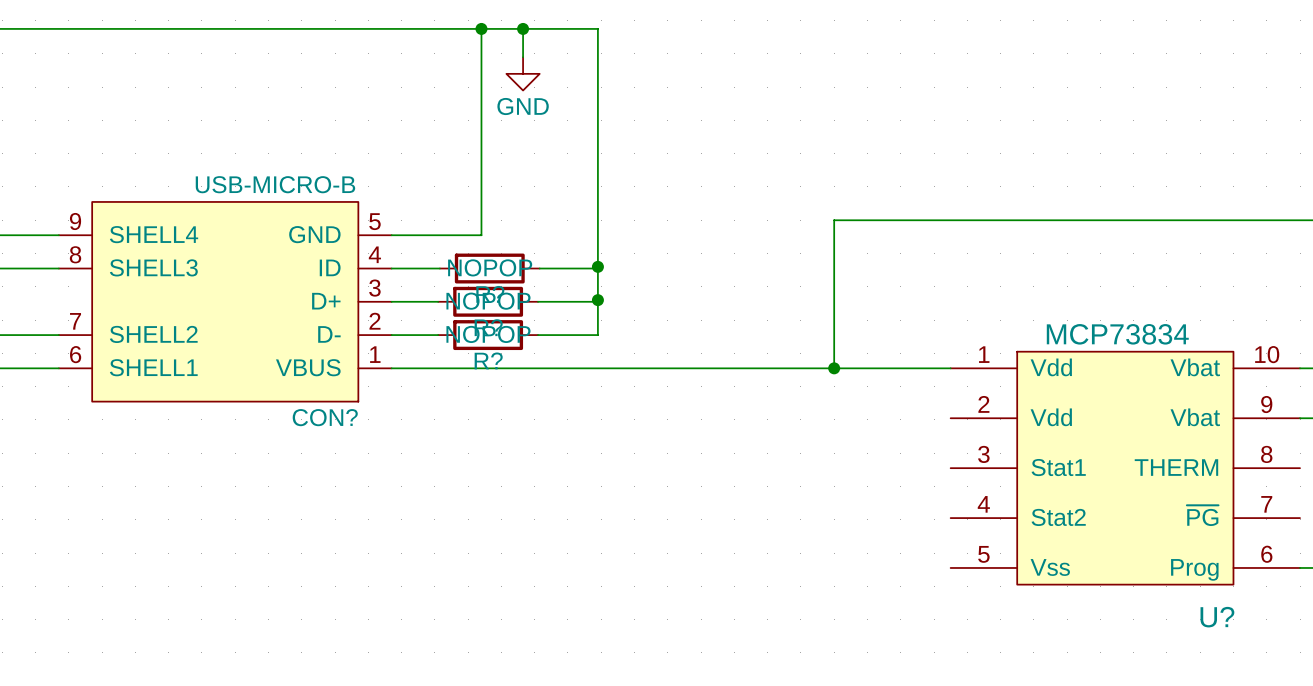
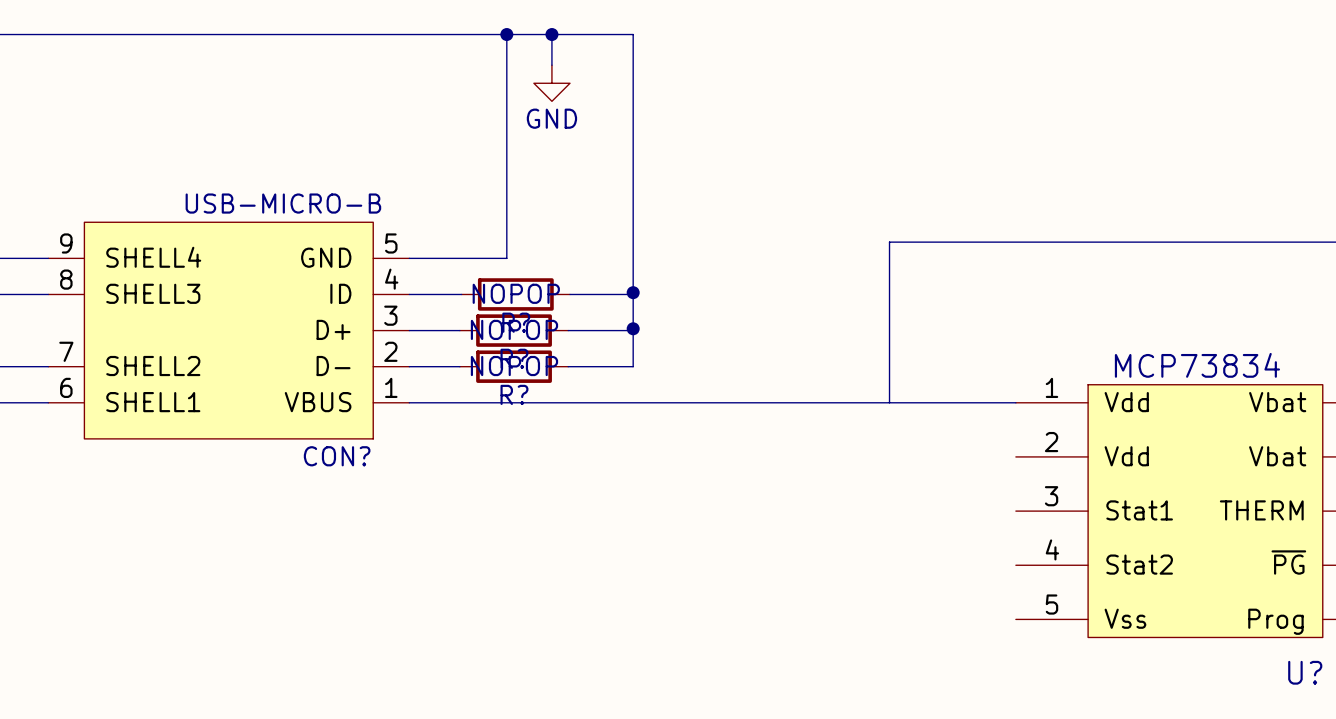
junction: (834, 368) -> none

